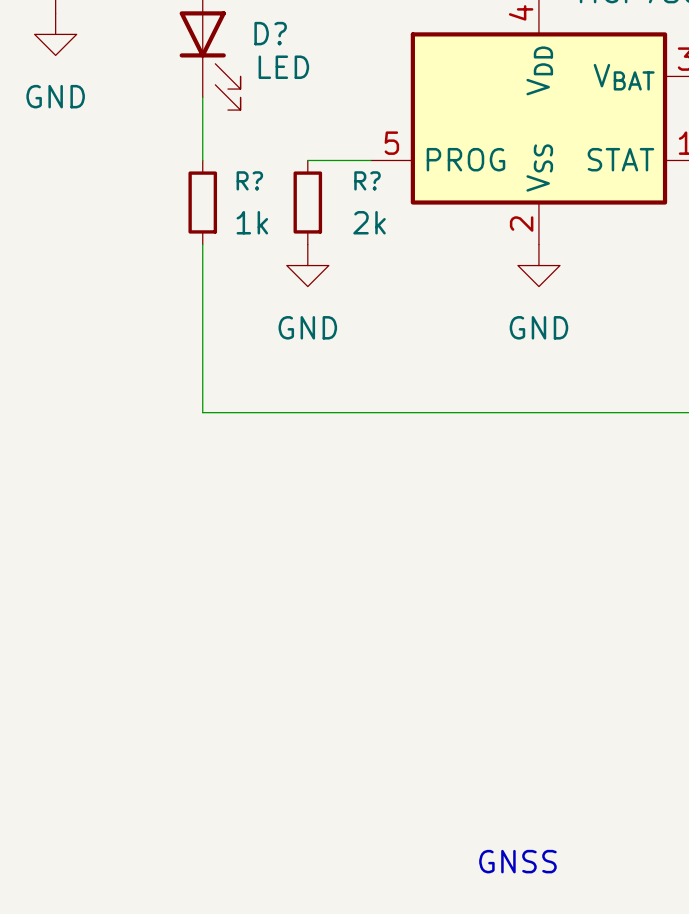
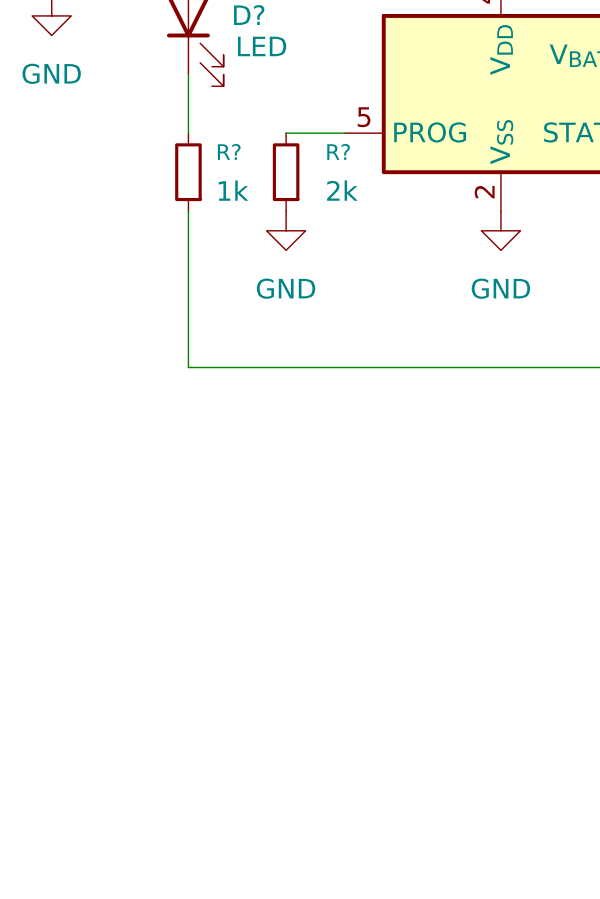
text: GNSS (517, 861) -> none

